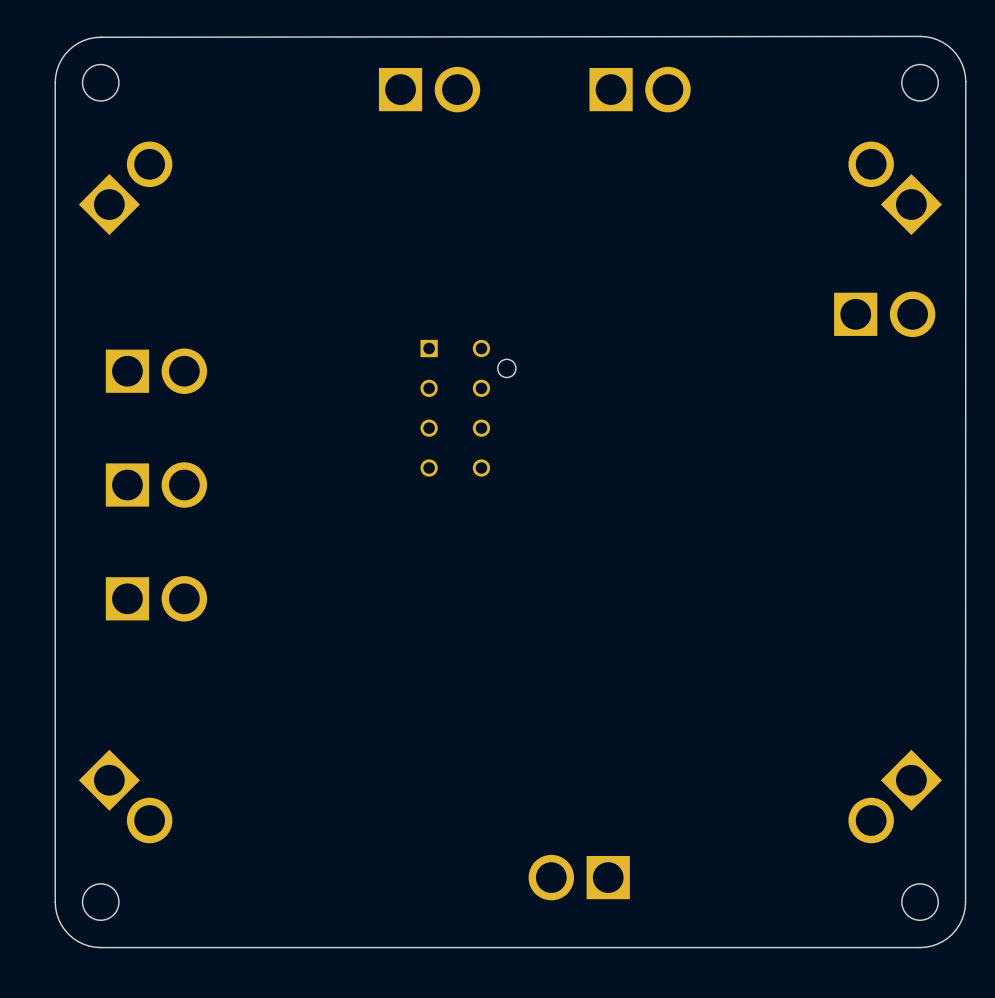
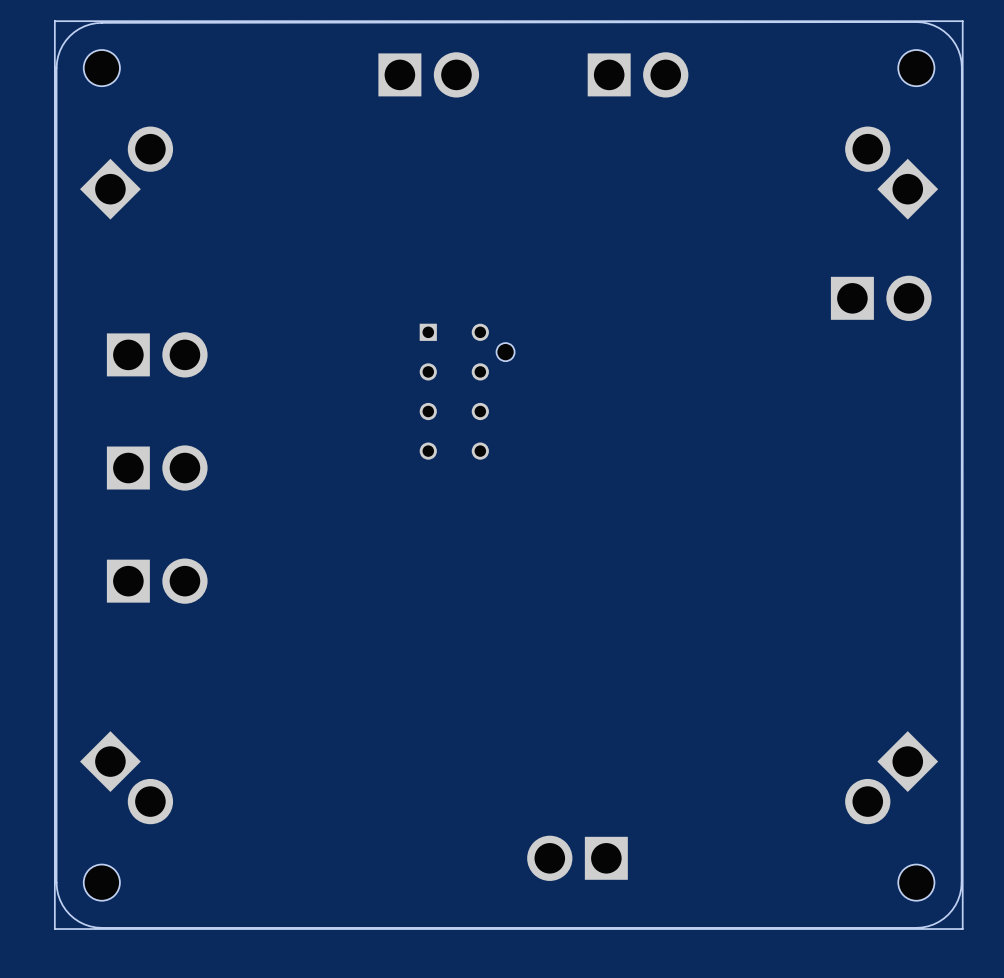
board edge: none -> (962, 21) (54, 21) (54, 929) (962, 929) (962, 21)

